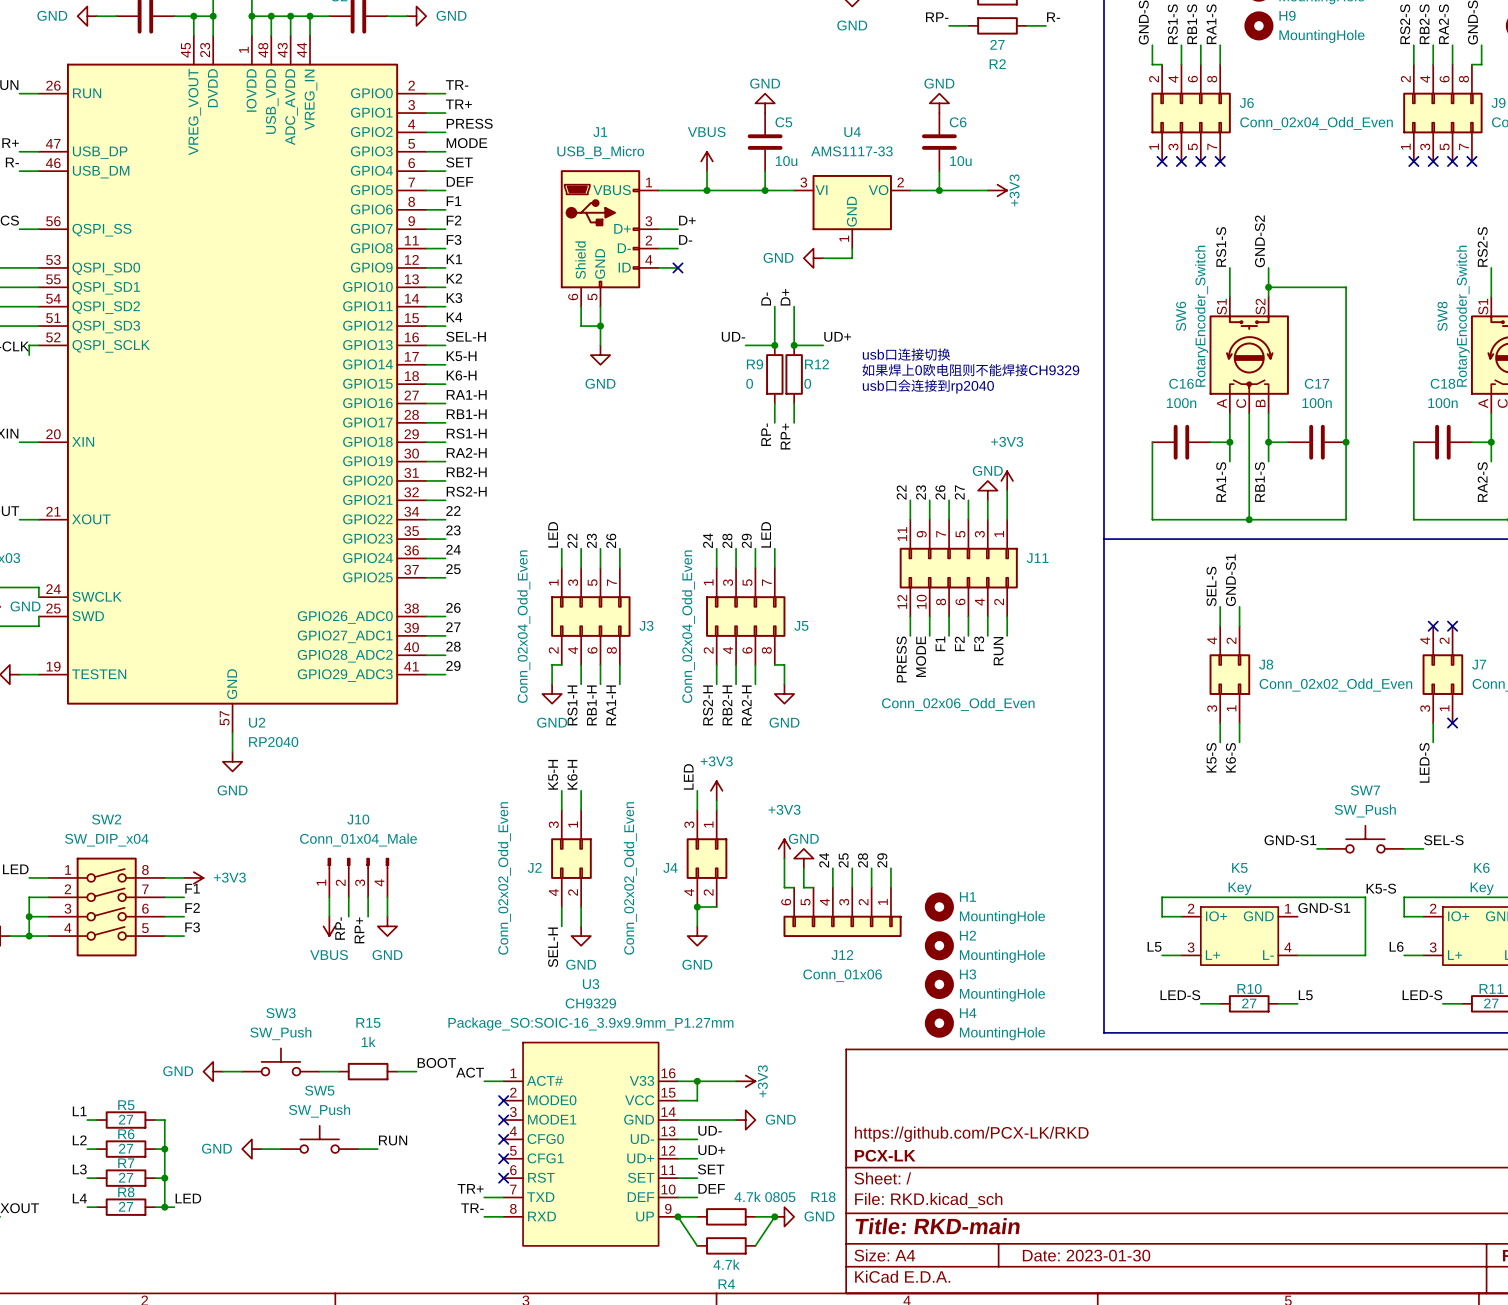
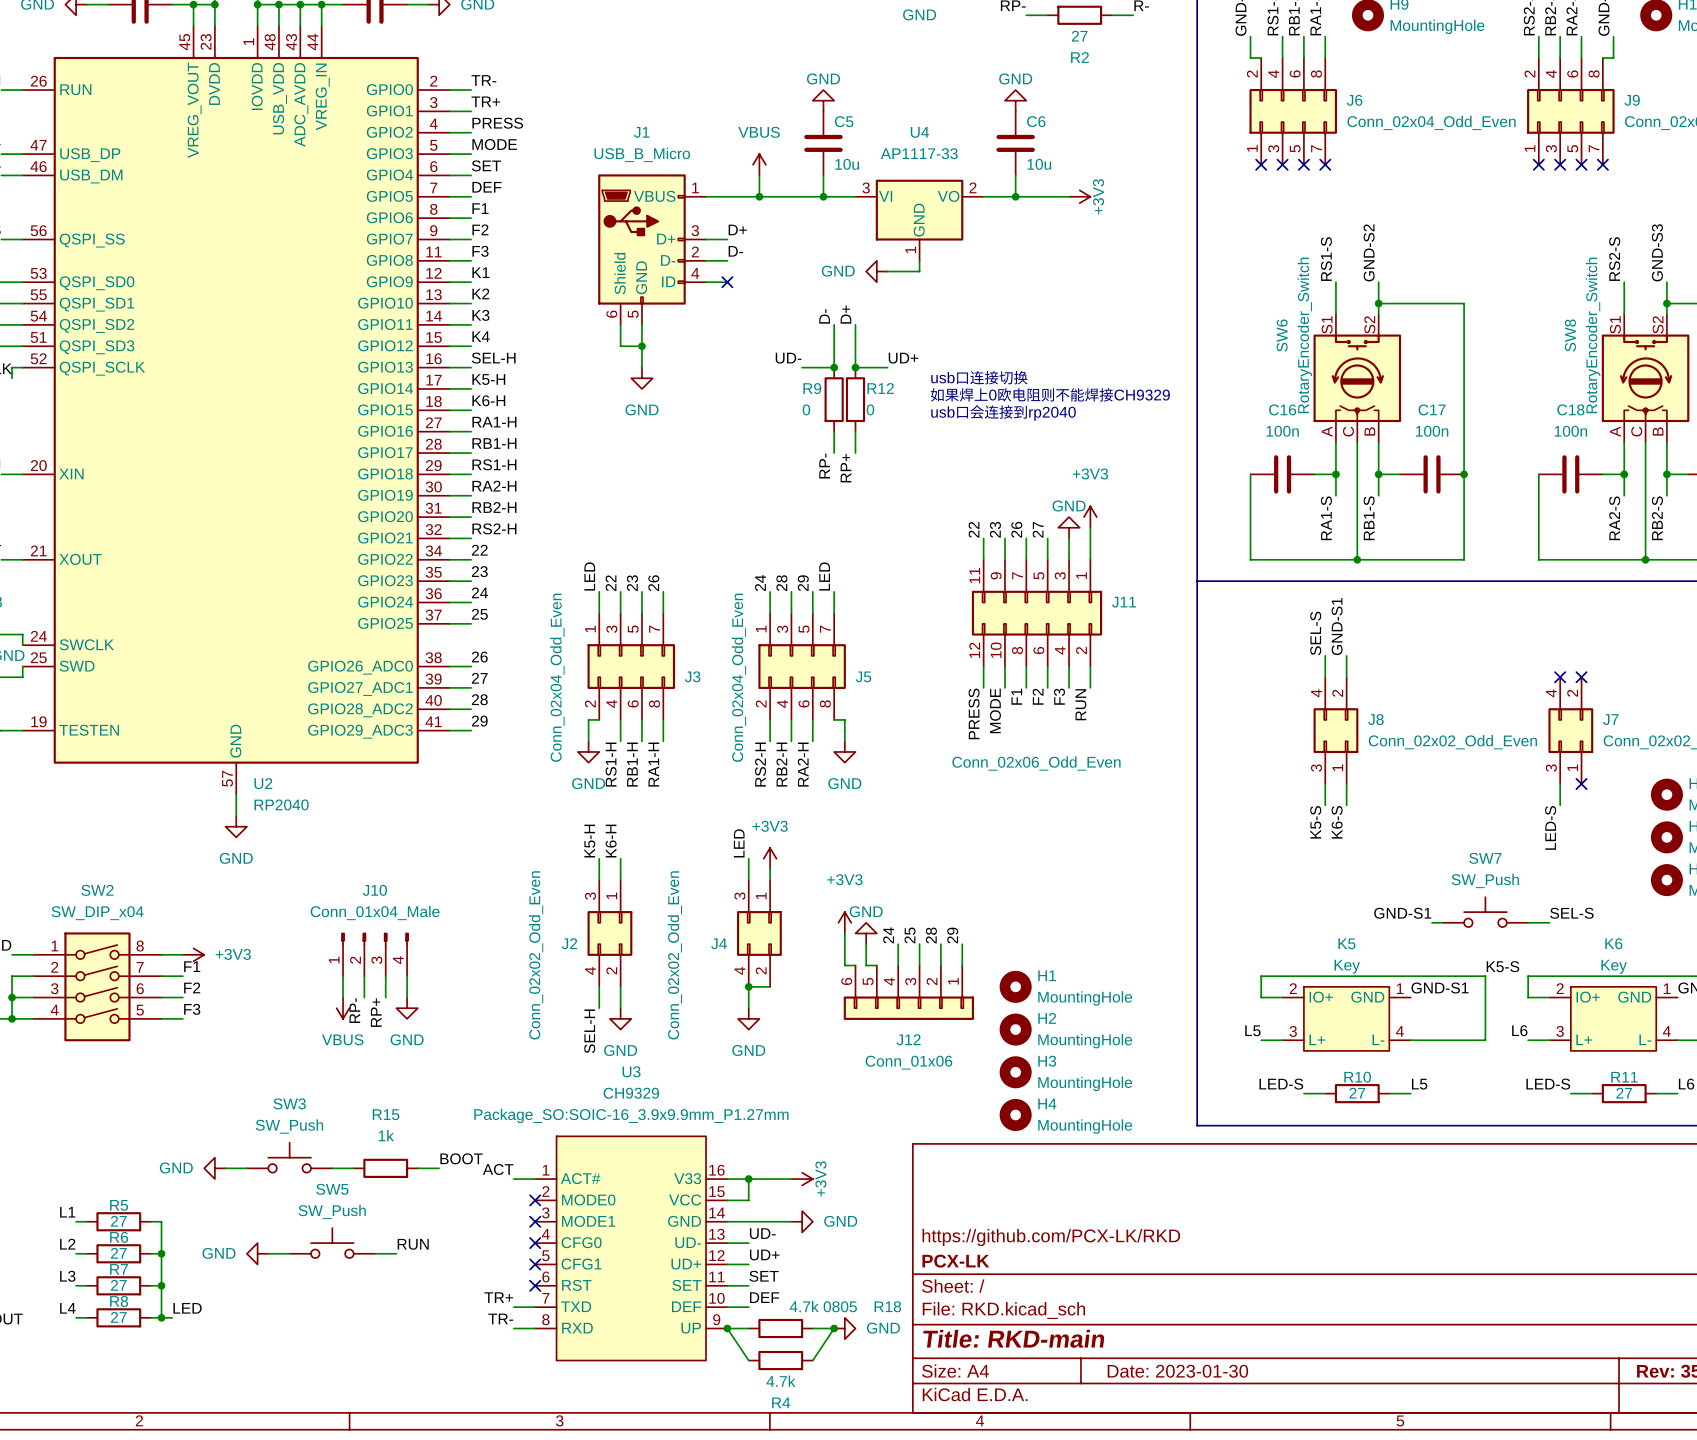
U4 value: AMS1117-33 (851, 151) -> AP1117-33 (919, 153)

